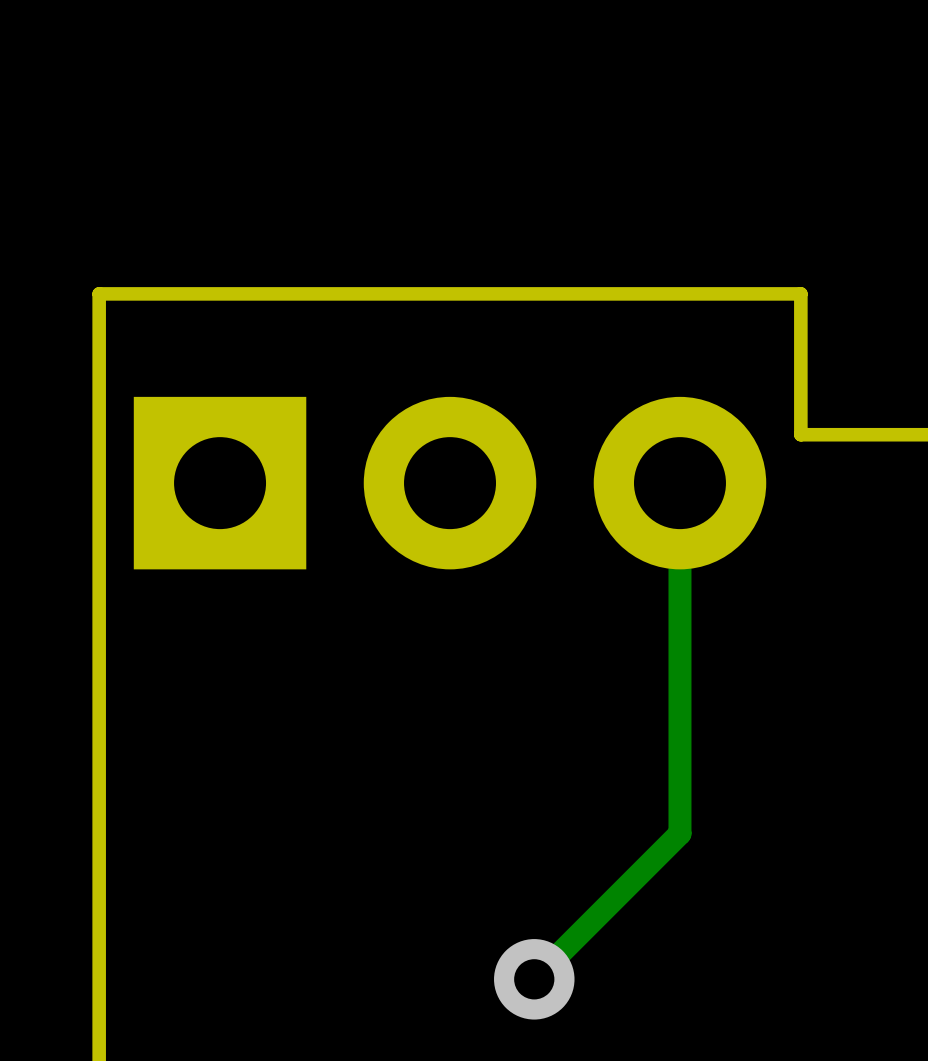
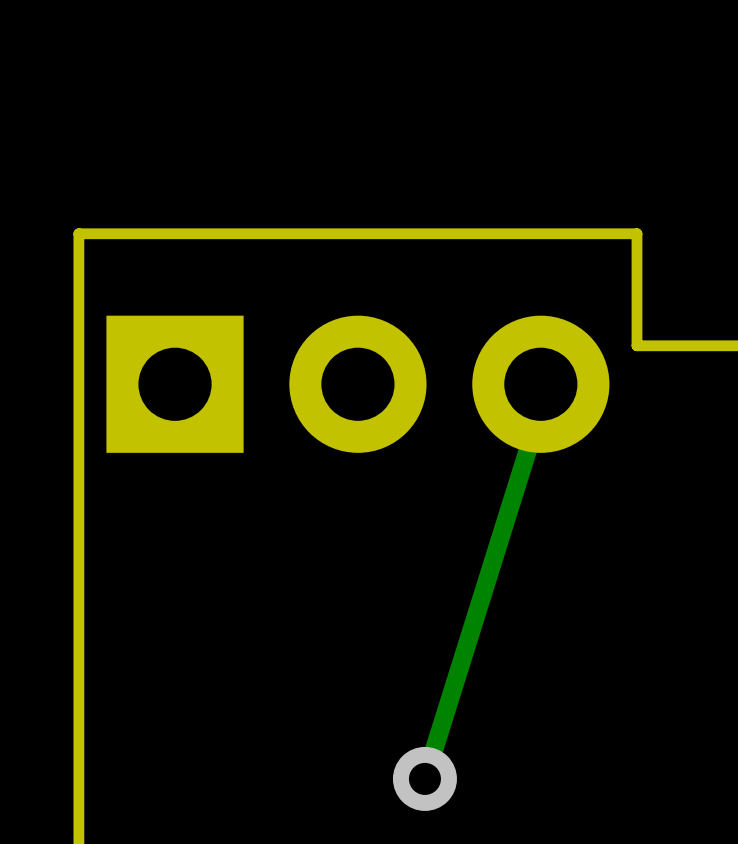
track: (679, 483) (679, 833) (534, 979) -> (540, 384) (545, 393) (424, 778)

